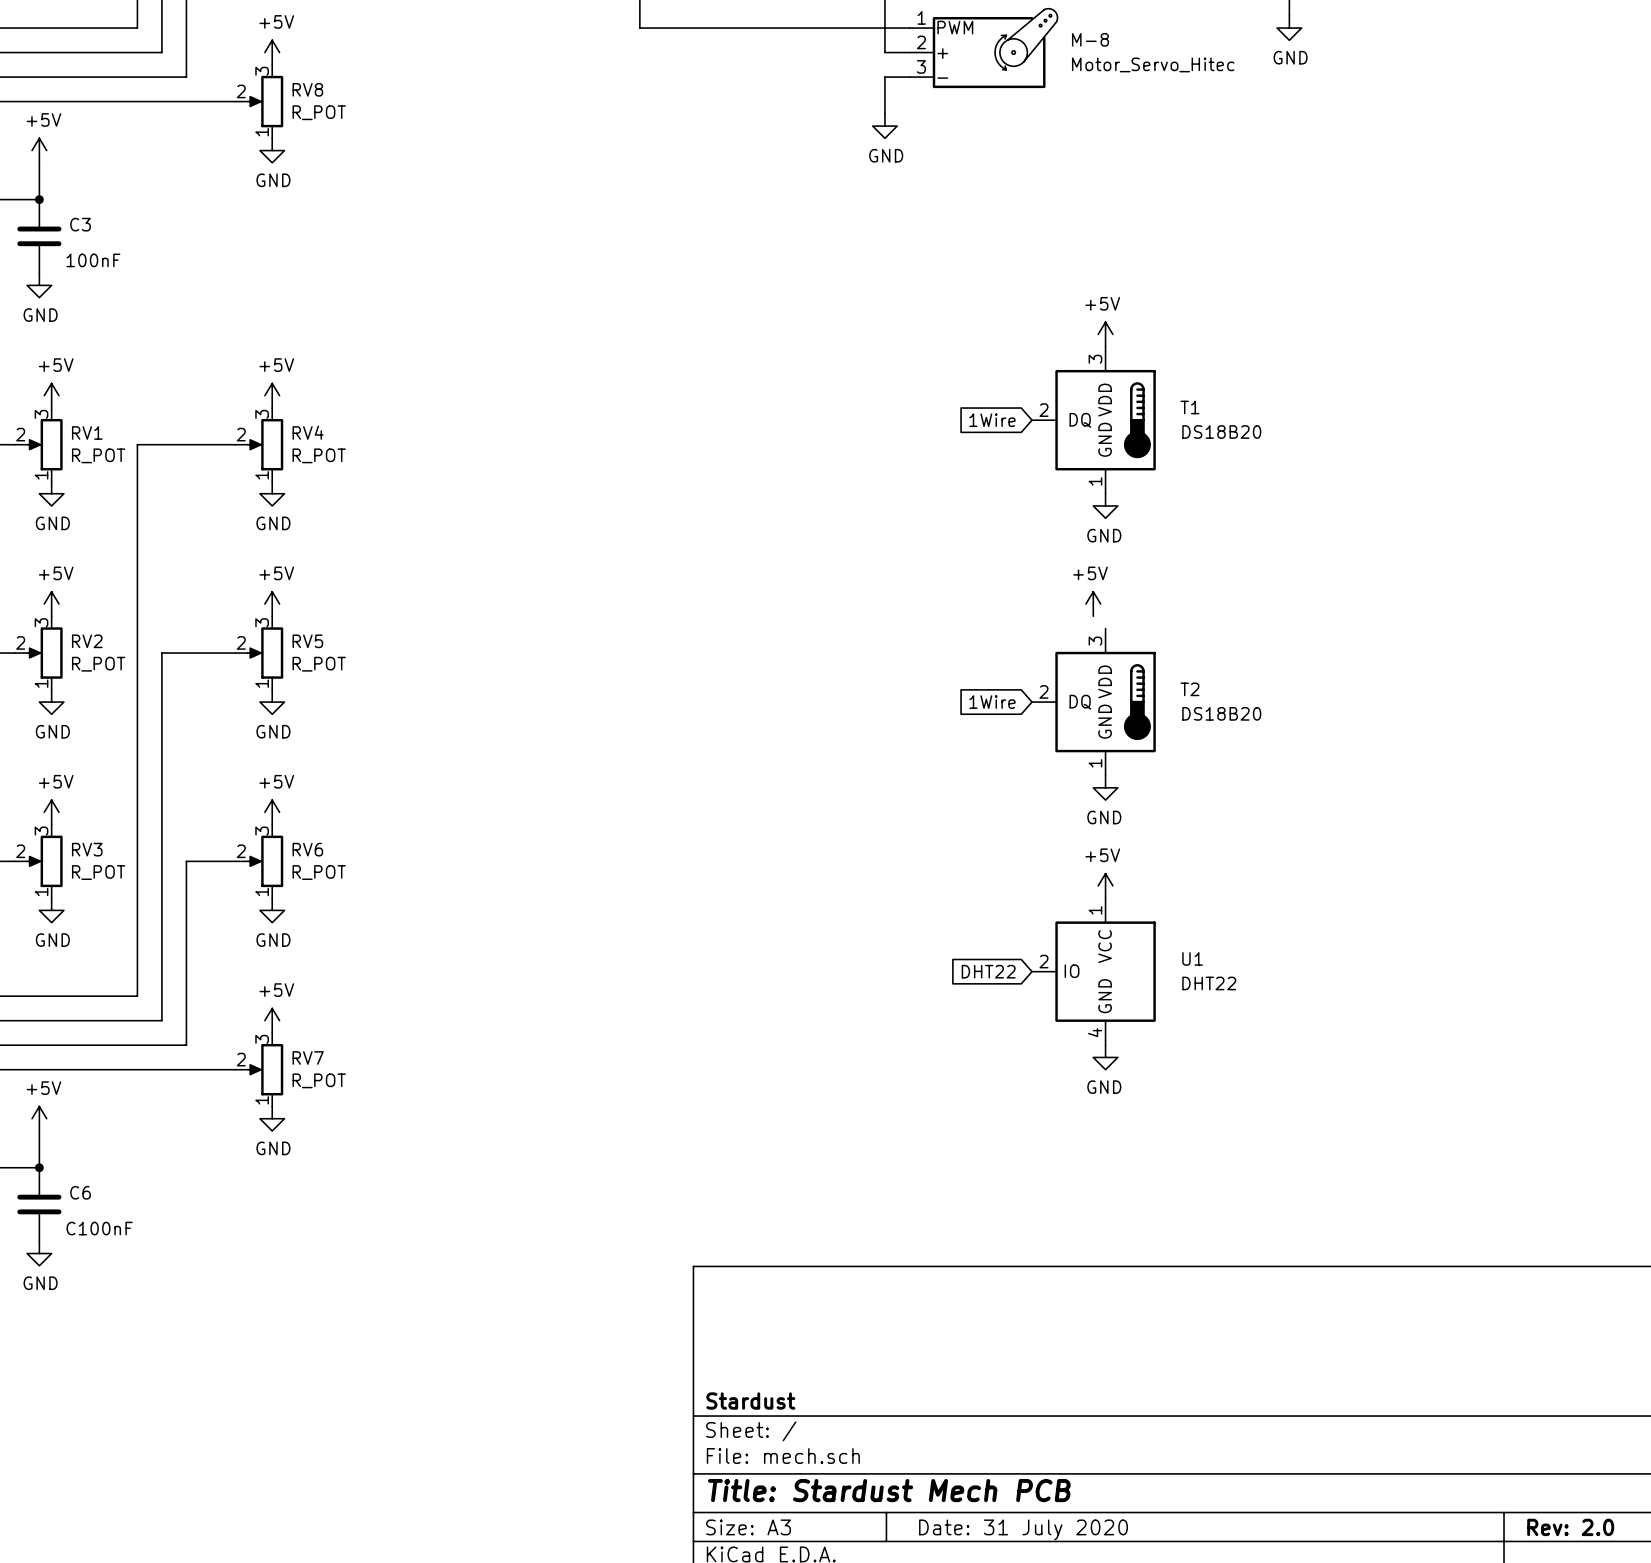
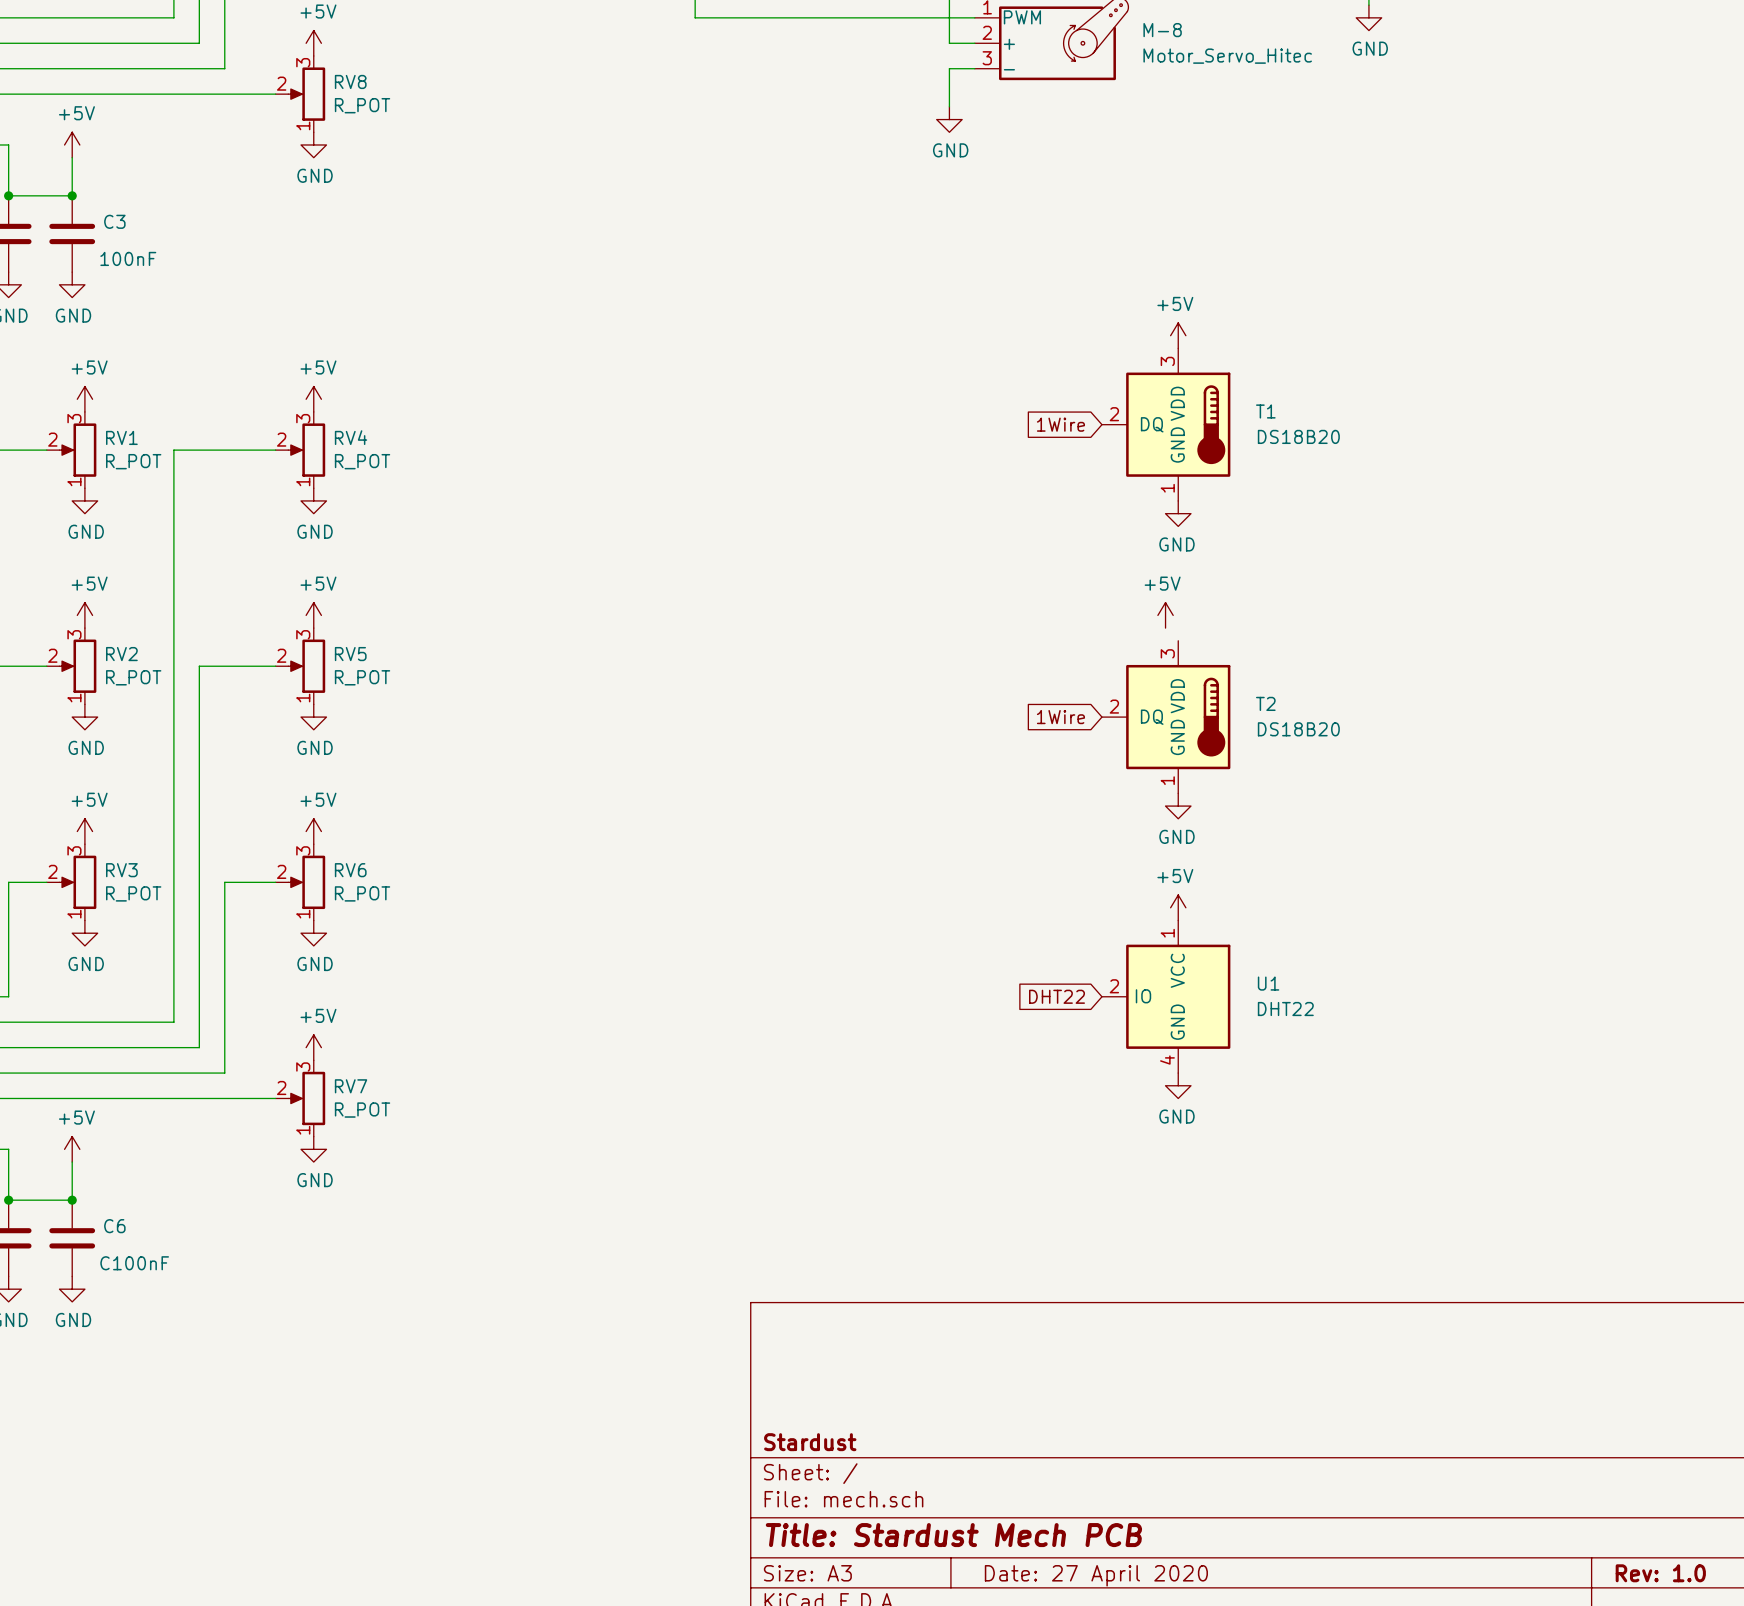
title block: Rev: 2.0 (1570, 1527) -> Rev: 1.0 (1660, 1573)
title block: Date: 31 July 2020 (1023, 1529) -> Date: 27 April 2020 (1096, 1575)

